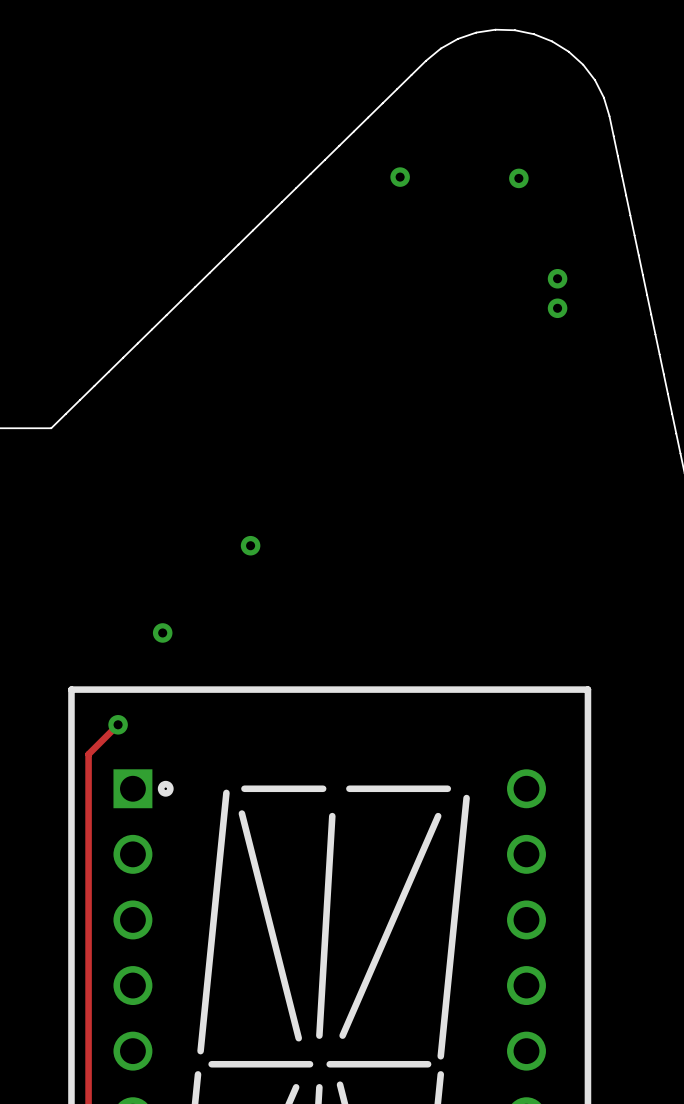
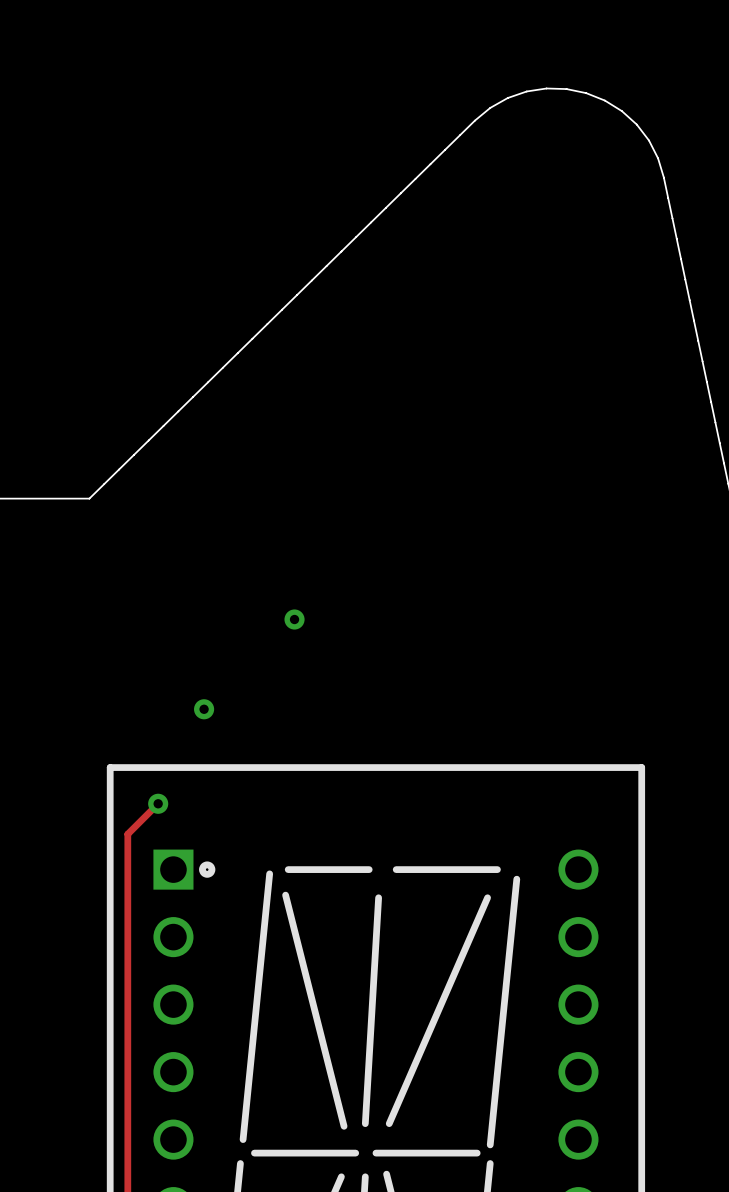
via: (400, 177) -> none
via: (518, 178) -> none
via: (557, 278) -> none
via: (557, 308) -> none

